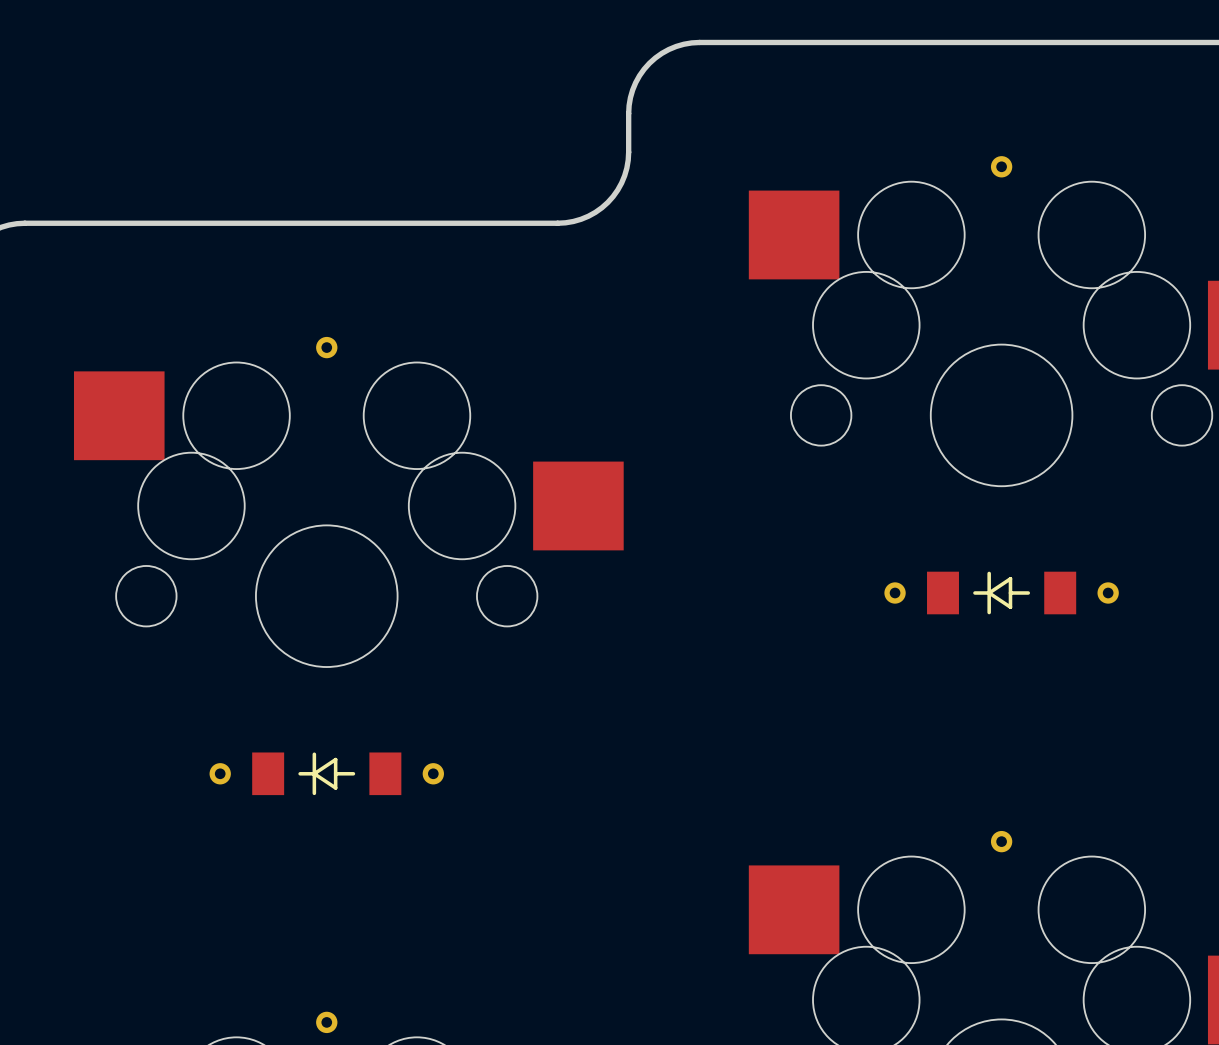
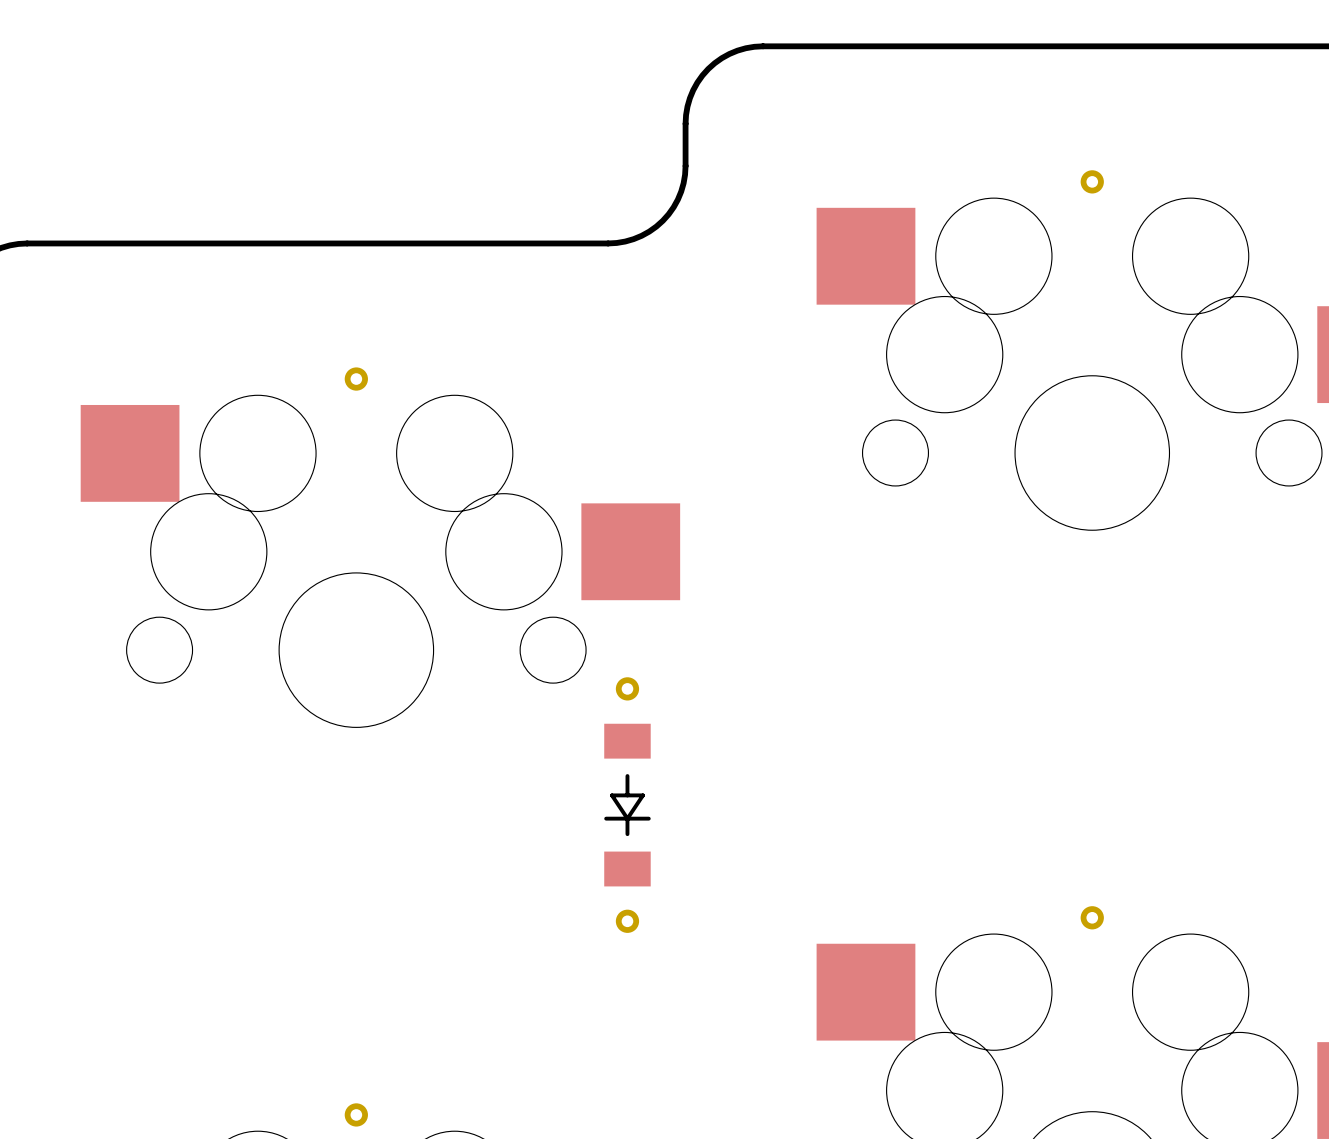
part: (895, 592) -> none
part: (1001, 592) -> none
part: (1108, 592) -> none
part: none -> (627, 688)
part: none -> (627, 805)
part: (220, 773) -> none
part: (326, 773) -> none
part: (433, 773) -> none
part: none -> (627, 921)

